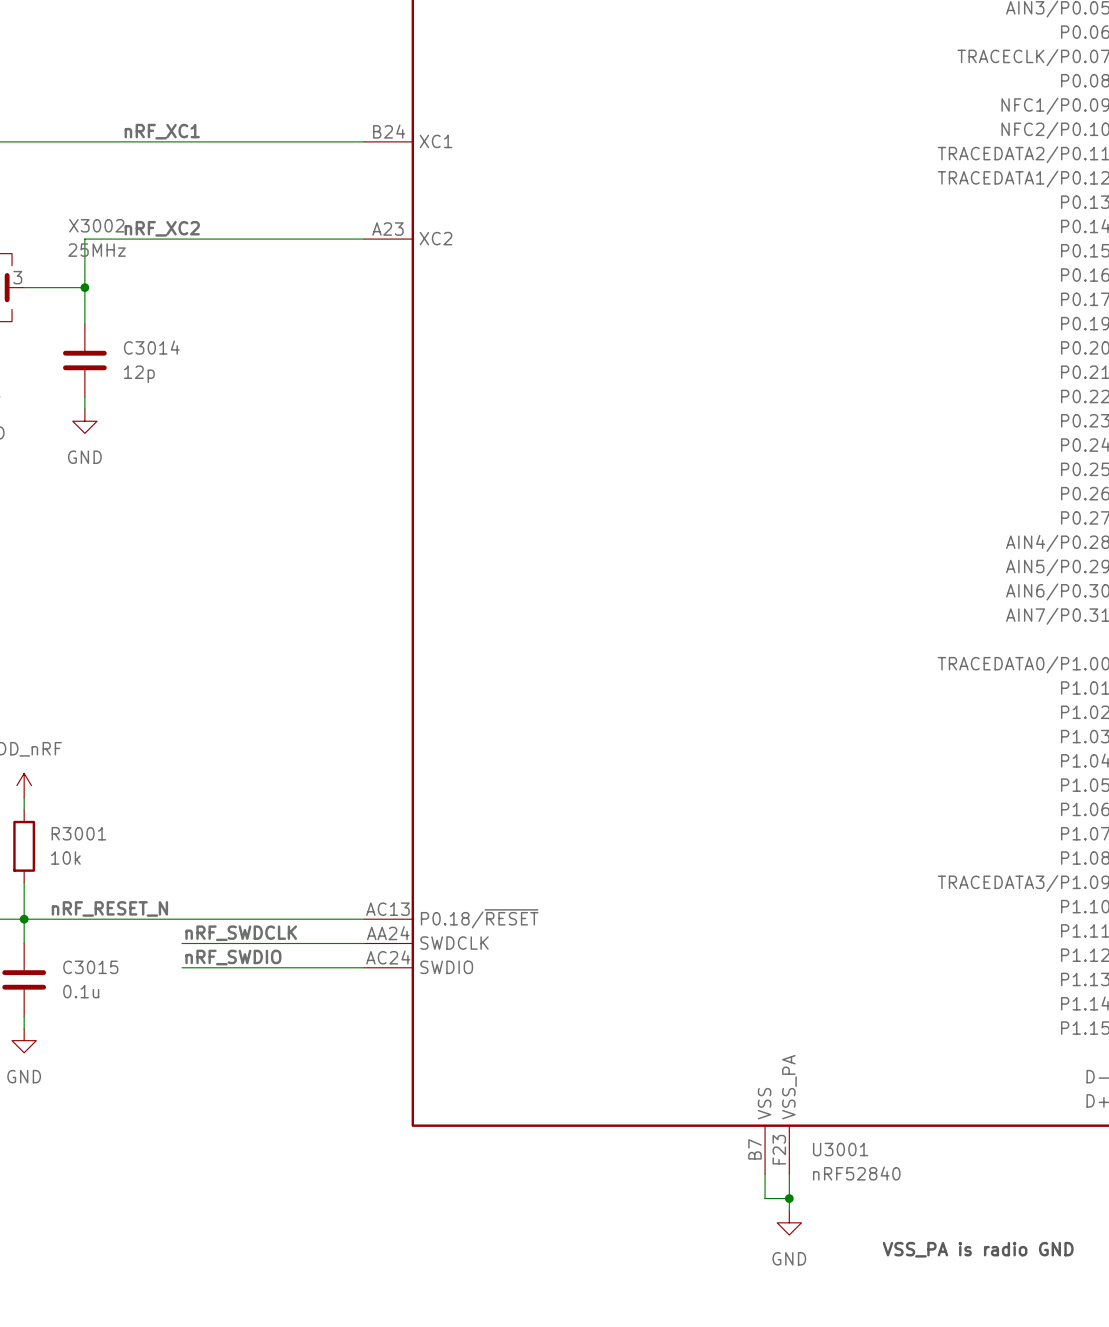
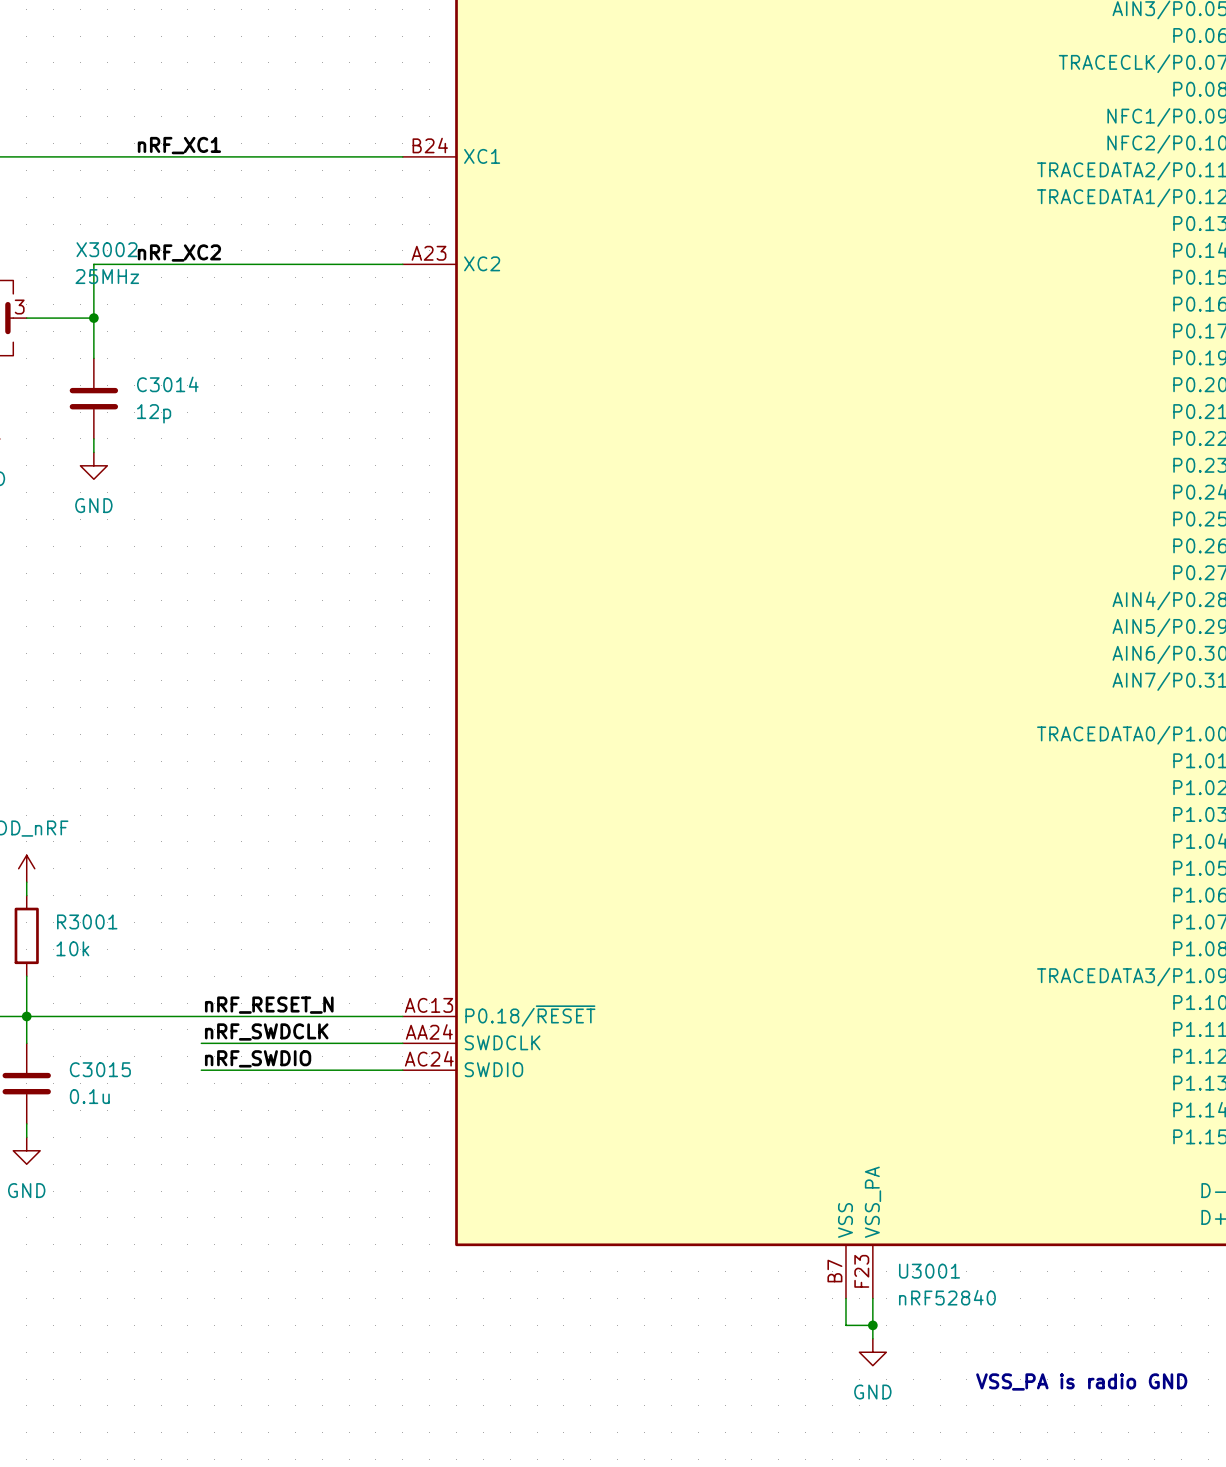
label position: nRF_RESET_N (109, 908) -> nRF_RESET_N (269, 1005)

